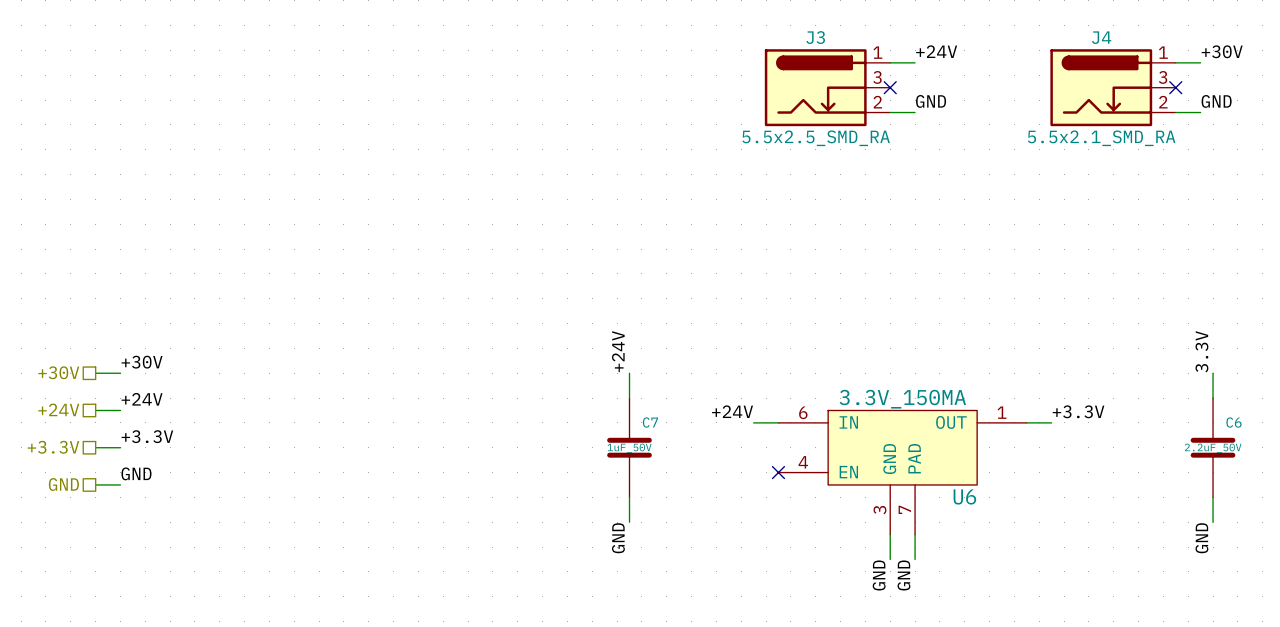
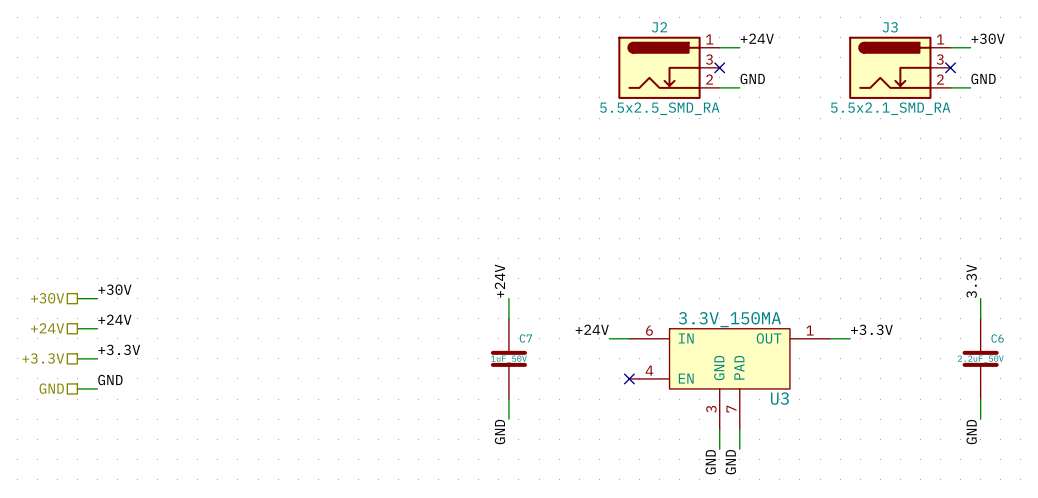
J3 name: J3 (815, 37) -> J2 (659, 27)
J4 name: J4 (1101, 37) -> J3 (890, 27)
U6 name: U6 (964, 496) -> U3 (779, 398)

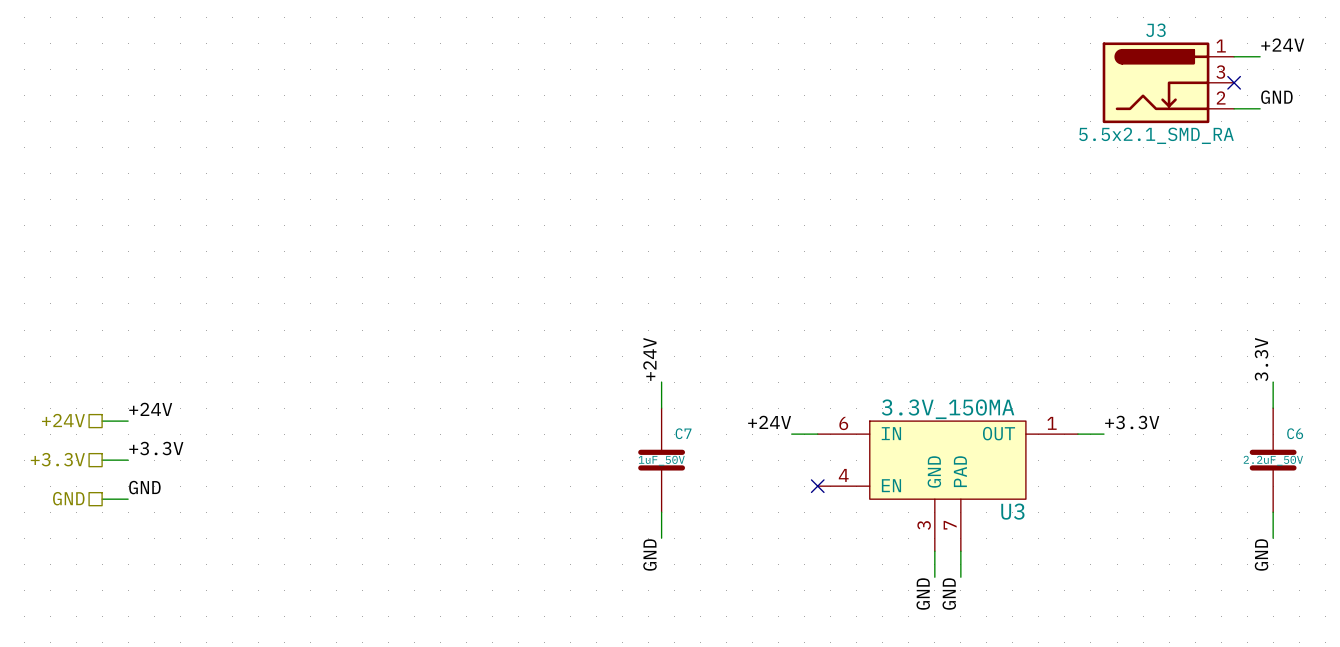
label: +24V (757, 38) -> none
label: +30V (988, 38) -> +24V (1282, 45)
wire: (719, 47) (739, 47) -> none
J2: 5.5x2.5_SMD_RA (669, 67) -> none
no-connect mark: (719, 67) -> none
label: GND (752, 78) -> none
wire: (719, 87) (739, 87) -> none
label: +30V (114, 289) -> none
hierarchical label: +30V (47, 298) -> none
wire: (77, 298) (97, 298) -> none

